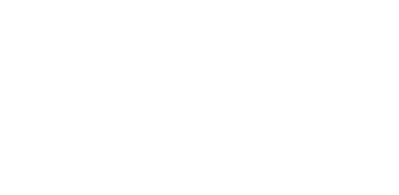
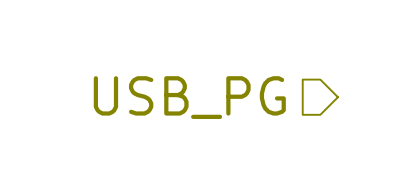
hierarchical label: none -> USB_PG (189, 97)

